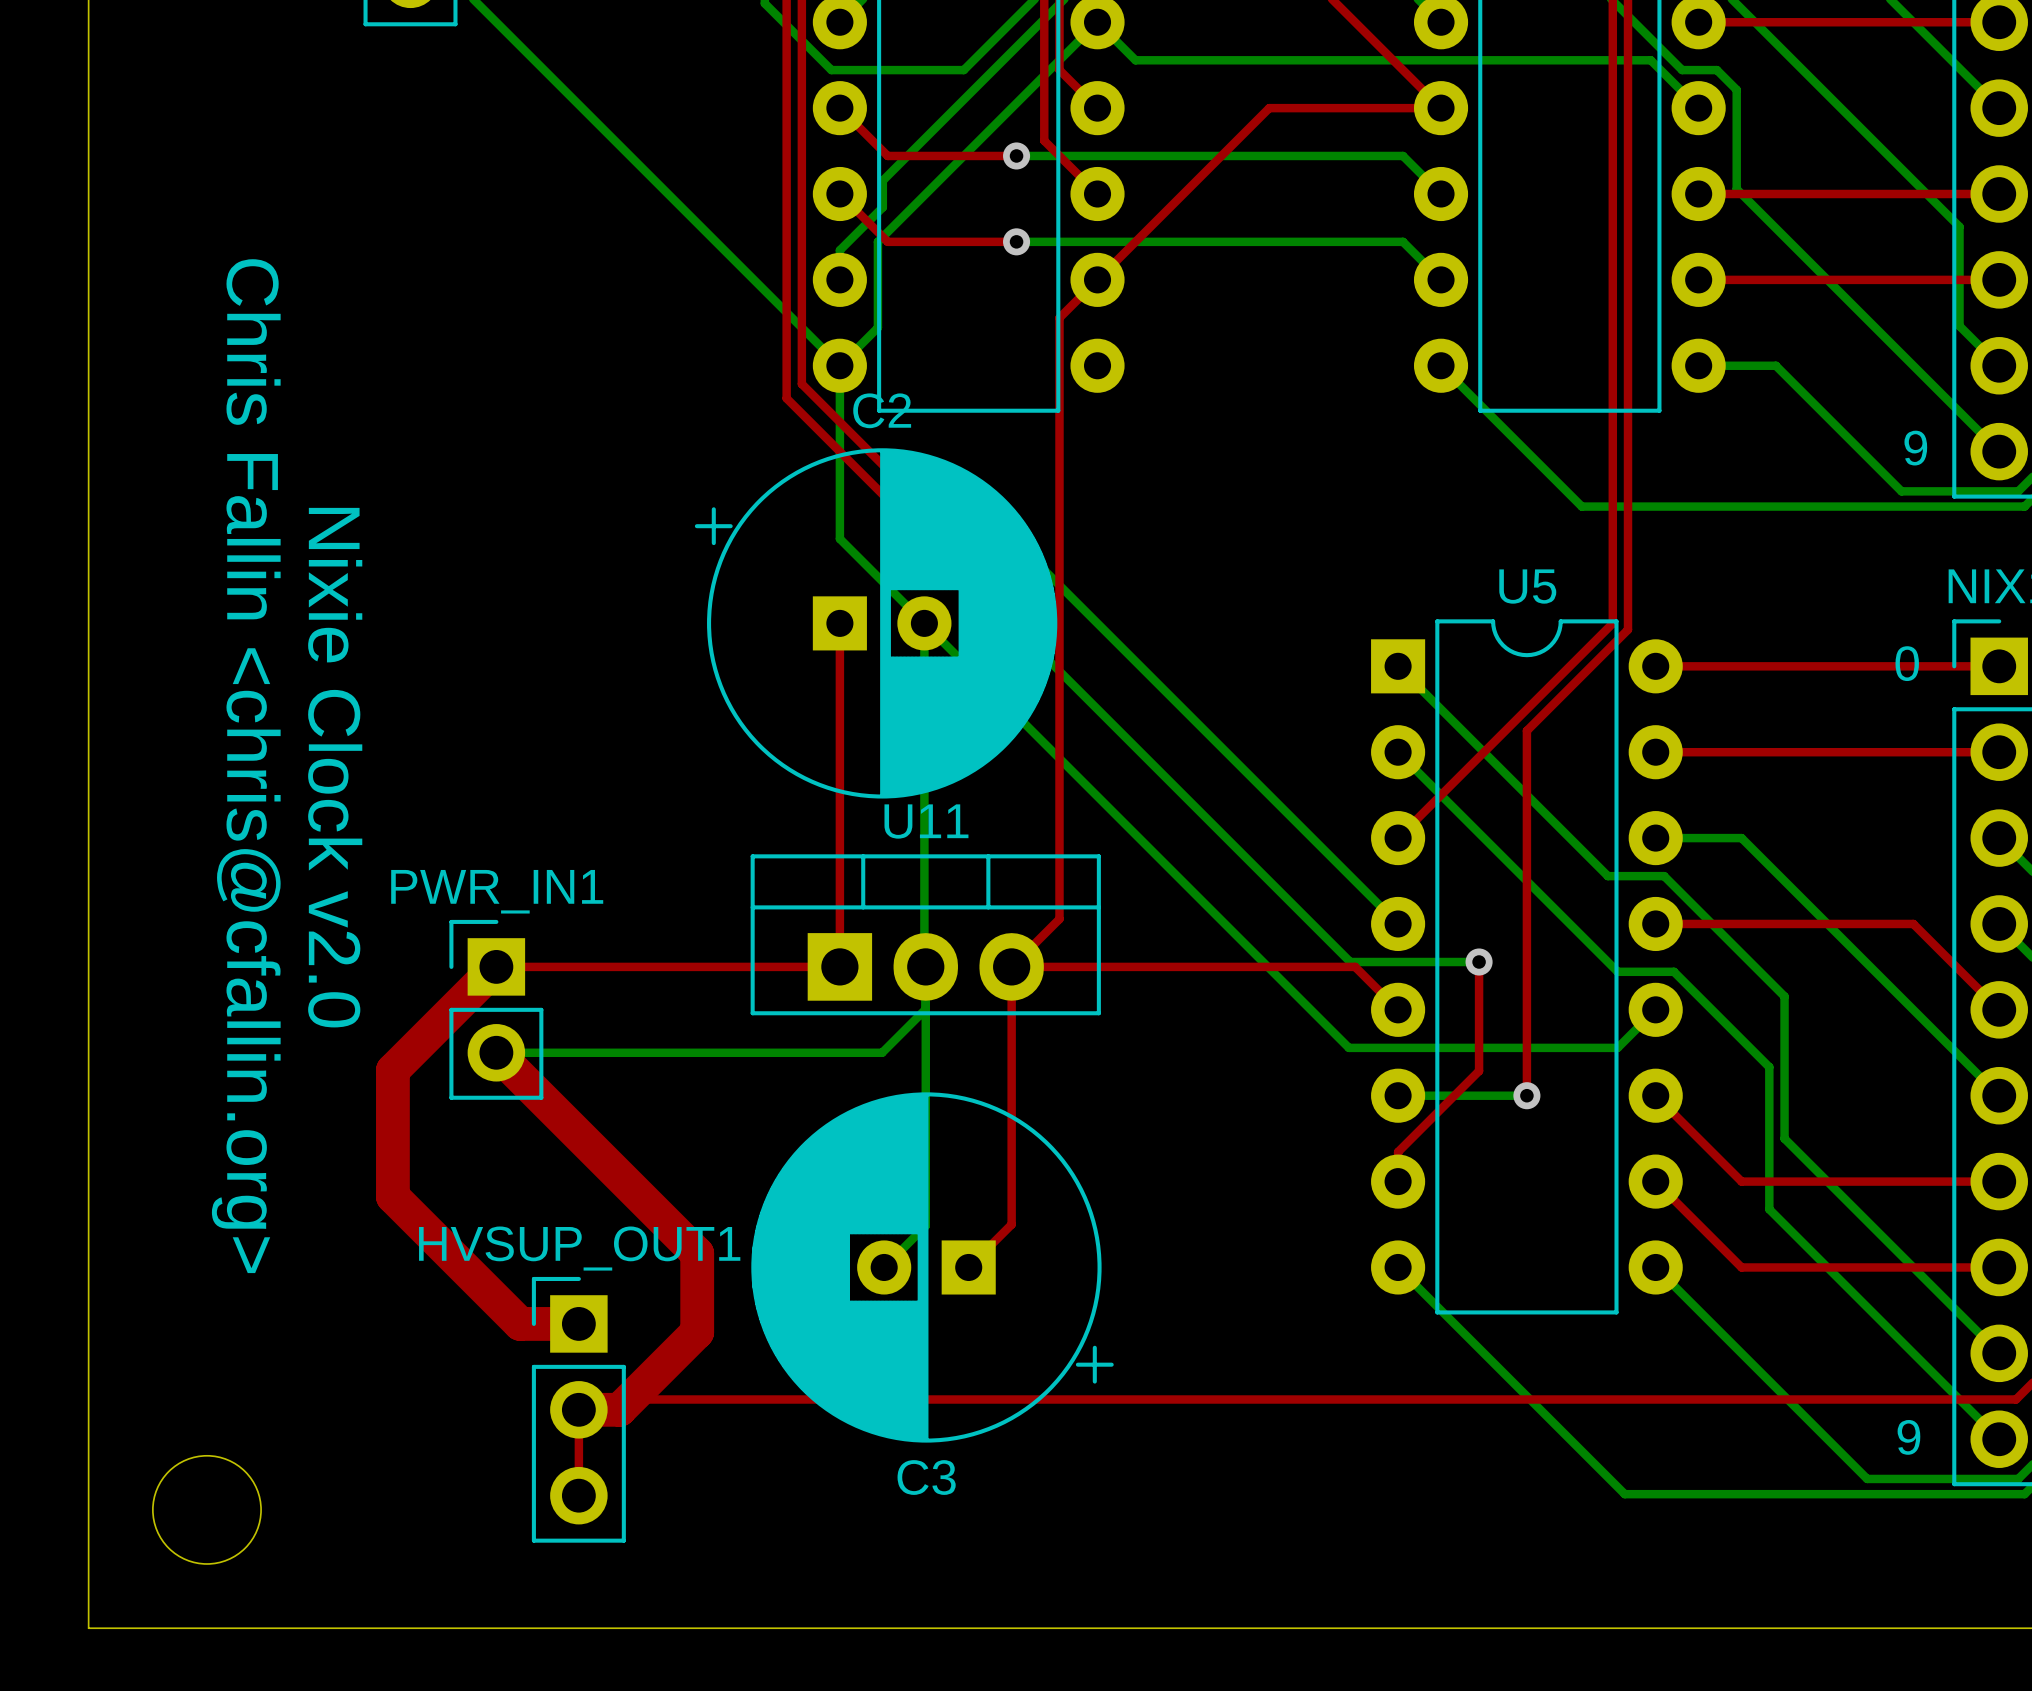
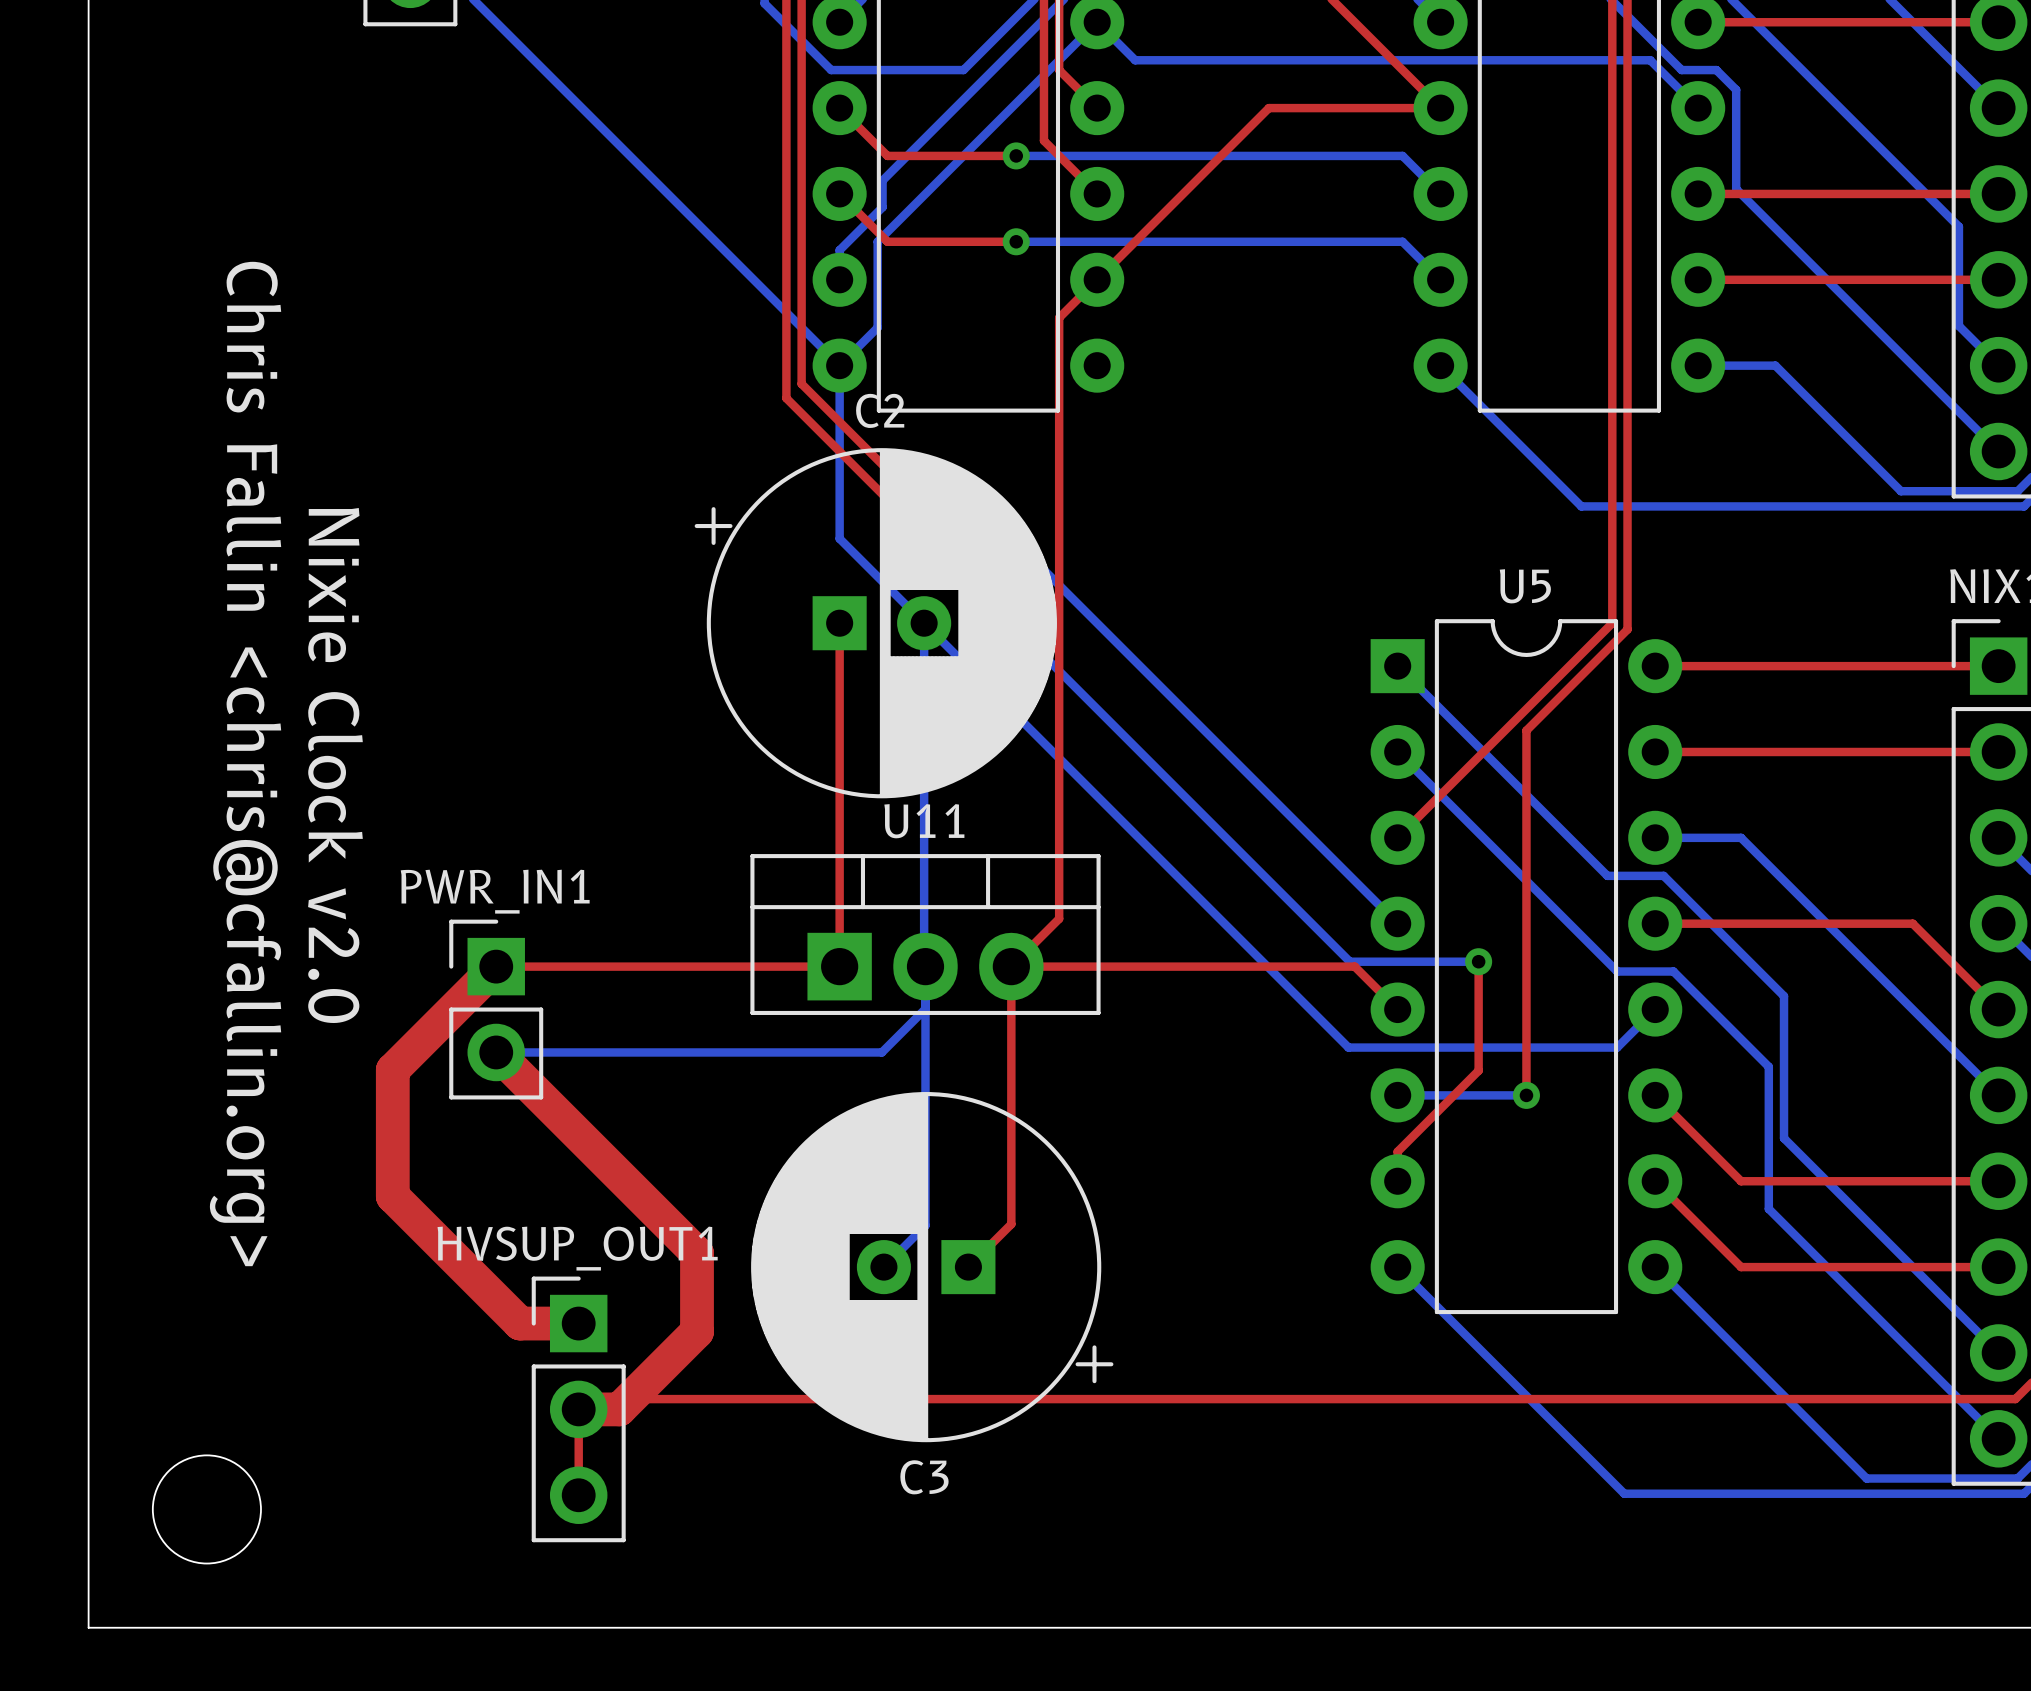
text: 9 (1915, 448) -> none
text: 0 (1907, 663) -> none
text: 9 (1908, 1437) -> none

